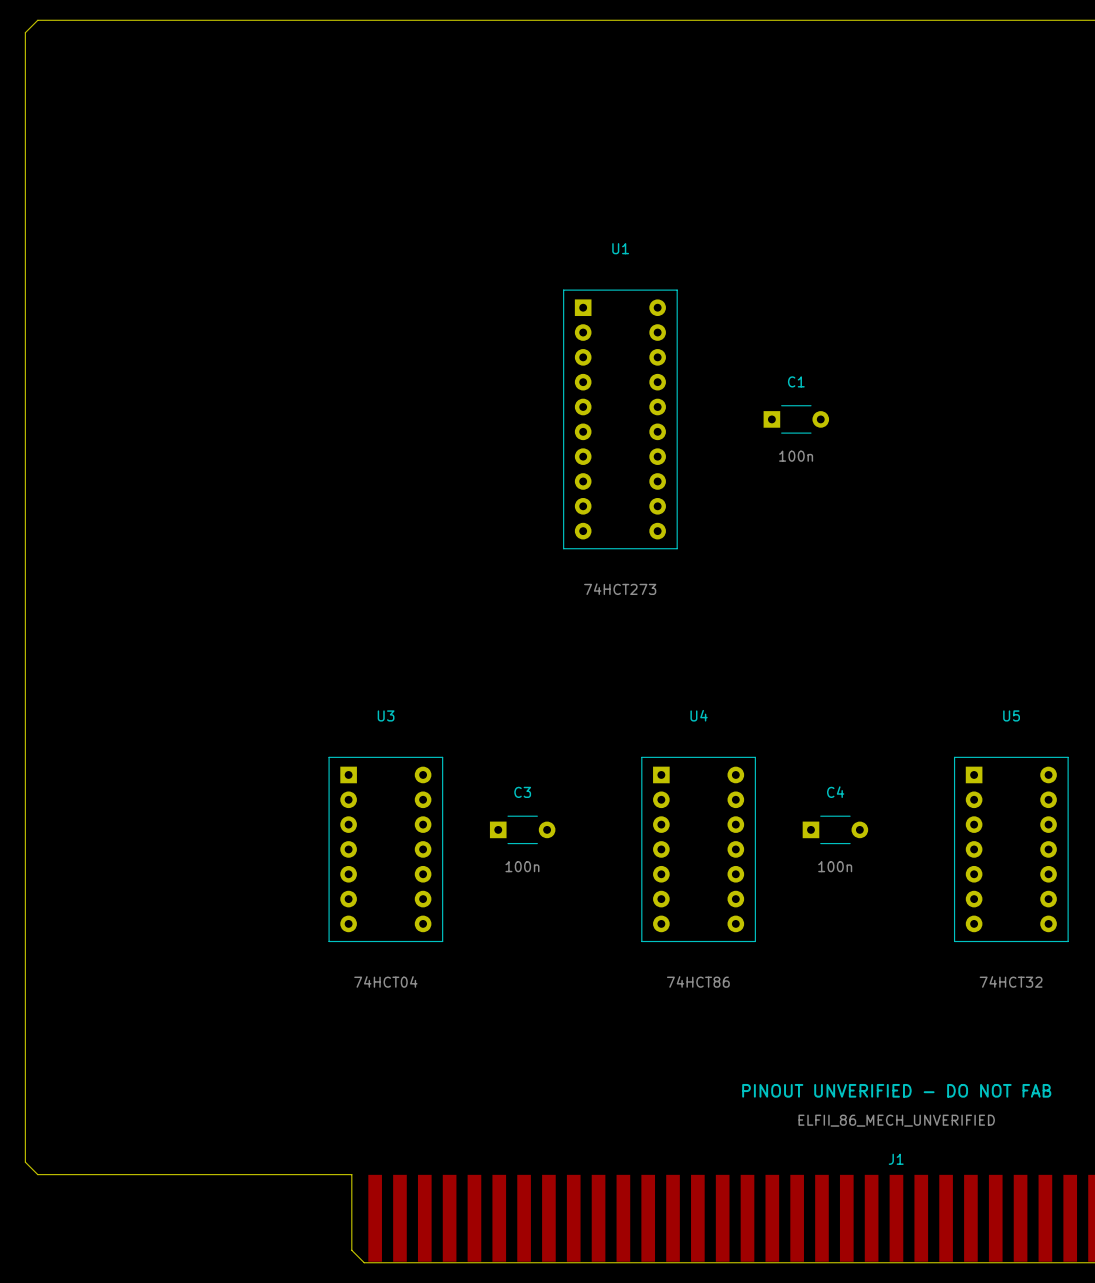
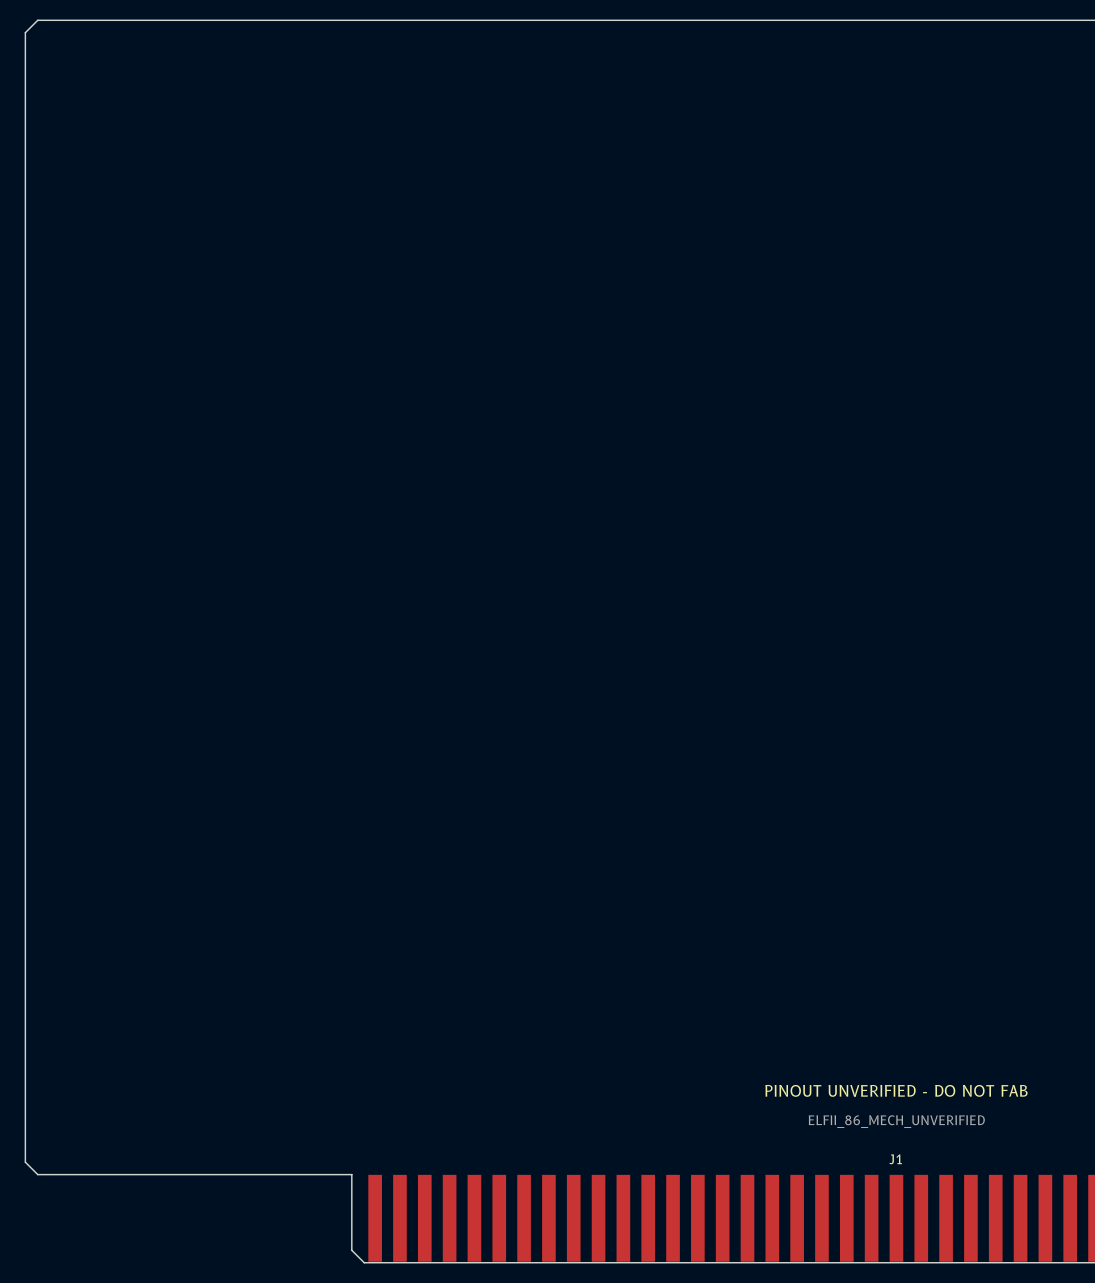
U1: 74HCT273 (620, 419) -> none
C1: 100n (796, 419) -> none
C3: 100n (522, 829) -> none
C4: 100n (835, 829) -> none
U3: 74HCT04 (385, 849) -> none
U4: 74HCT86 (698, 849) -> none
U5: 74HCT32 (1011, 849) -> none

